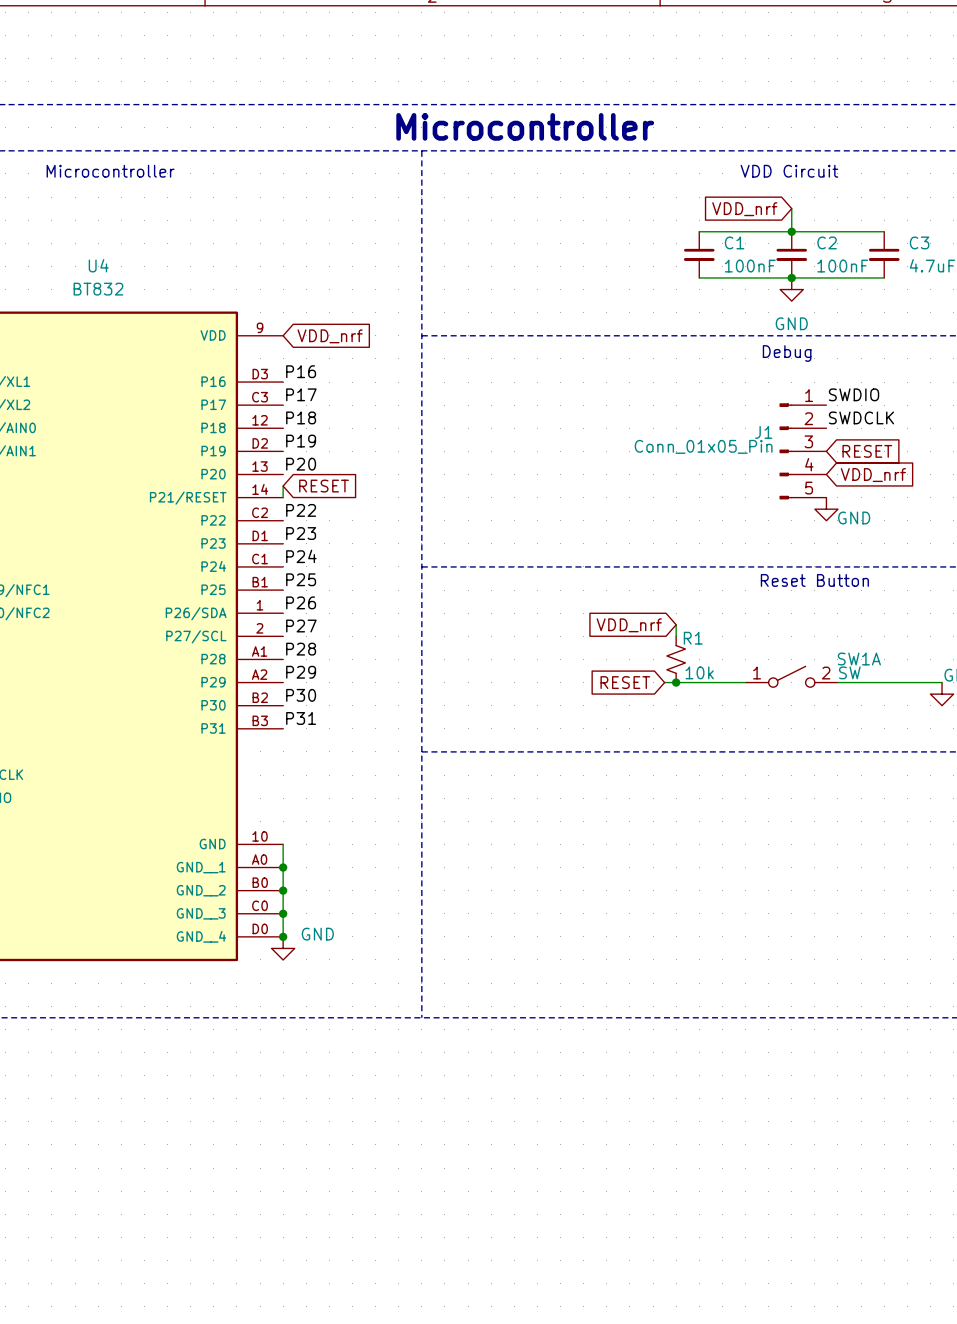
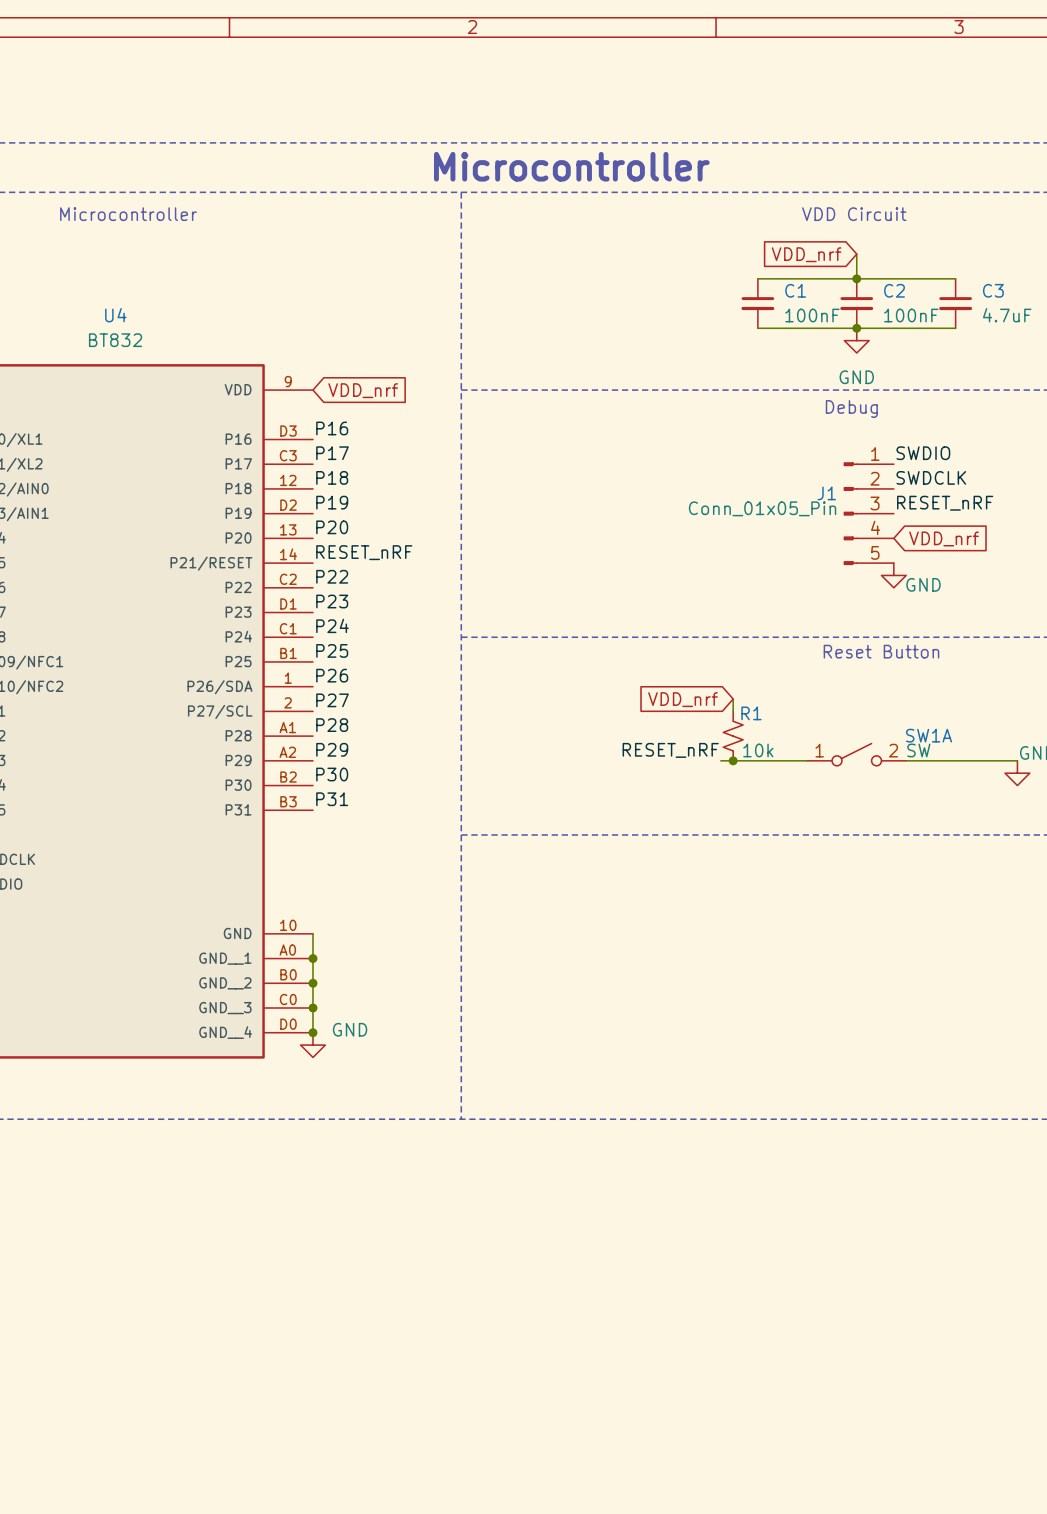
label: none -> RESET_nRF (945, 503)
global label: RESET (867, 451) -> none
wire: (283, 486) (283, 497) -> none
global label: RESET (324, 486) -> none
label: none -> RESET_nRF (364, 552)
label: none -> RESET_nRF (670, 750)
global label: RESET (625, 682) -> none

